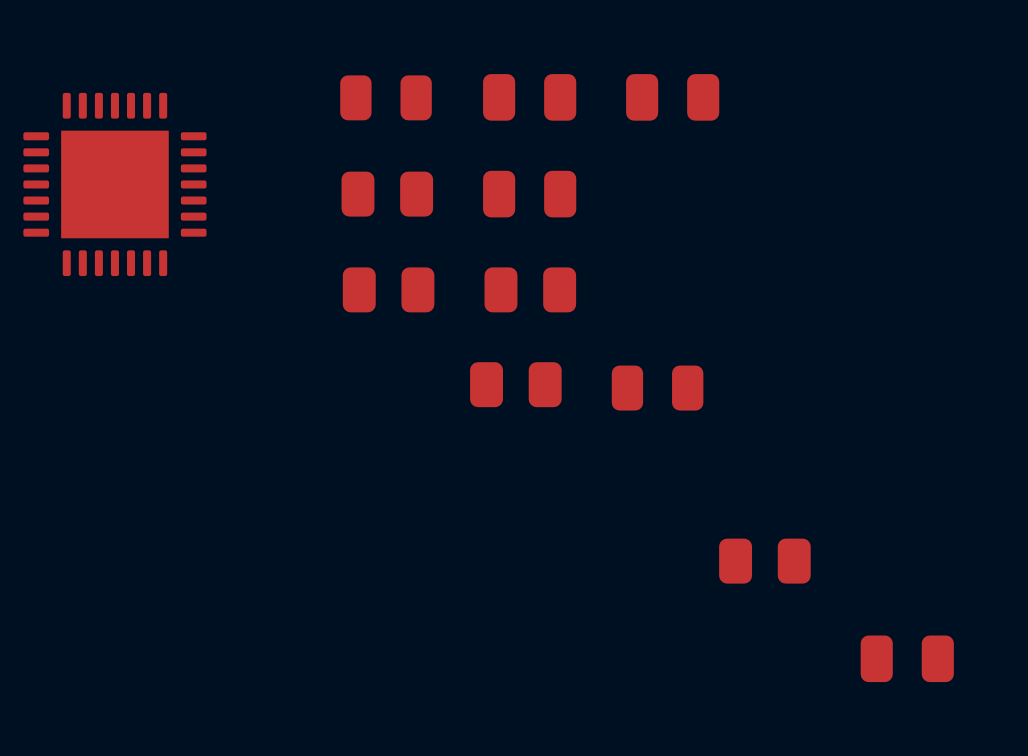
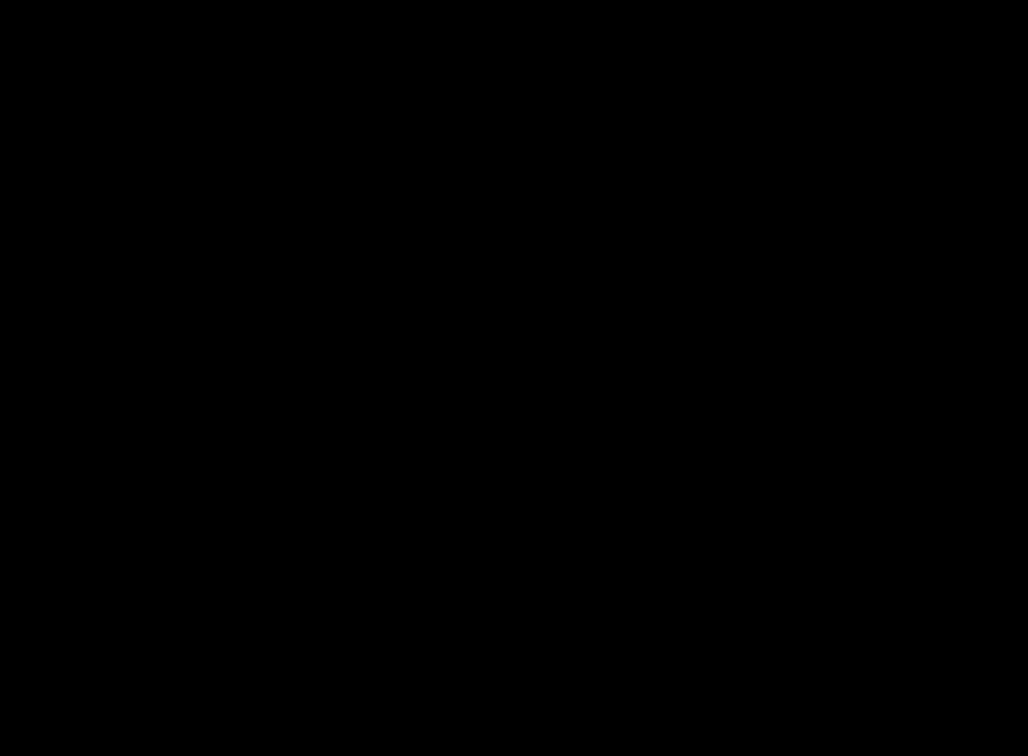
part: (386, 97) -> none
part: (529, 97) -> none
part: (672, 97) -> none
part: (114, 184) -> none
part: (387, 194) -> none
part: (529, 194) -> none
part: (388, 289) -> none
part: (530, 289) -> none
part: (515, 384) -> none
part: (657, 388) -> none
part: (764, 561) -> none
part: (907, 658) -> none

